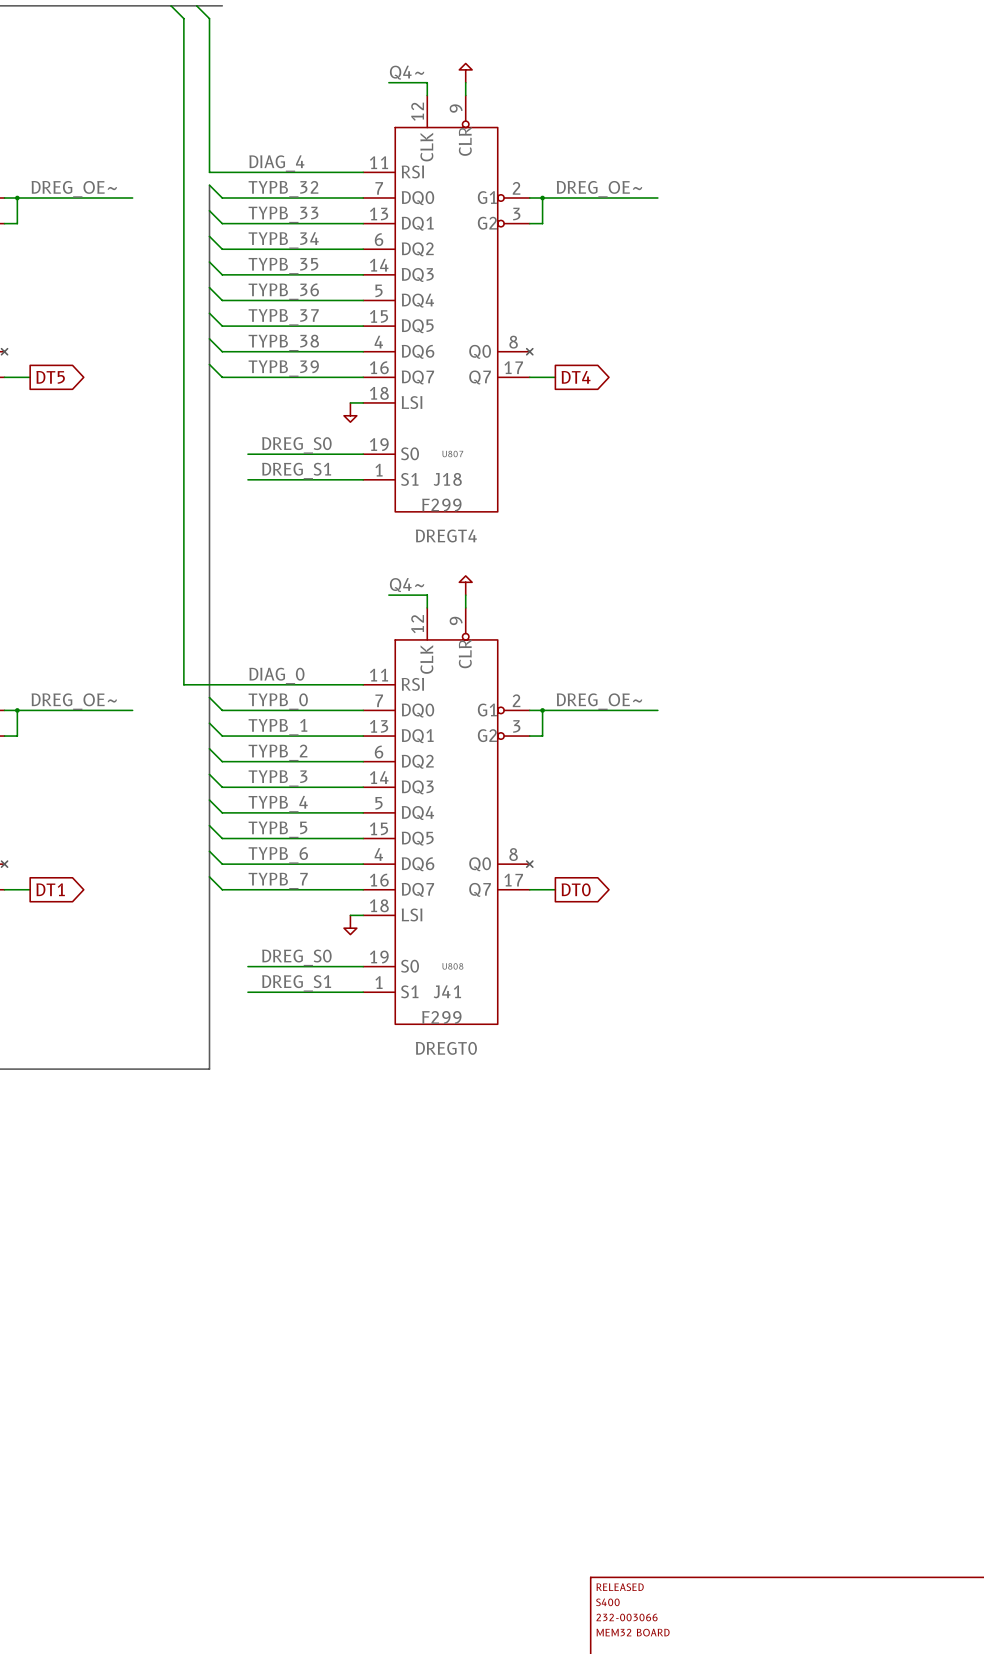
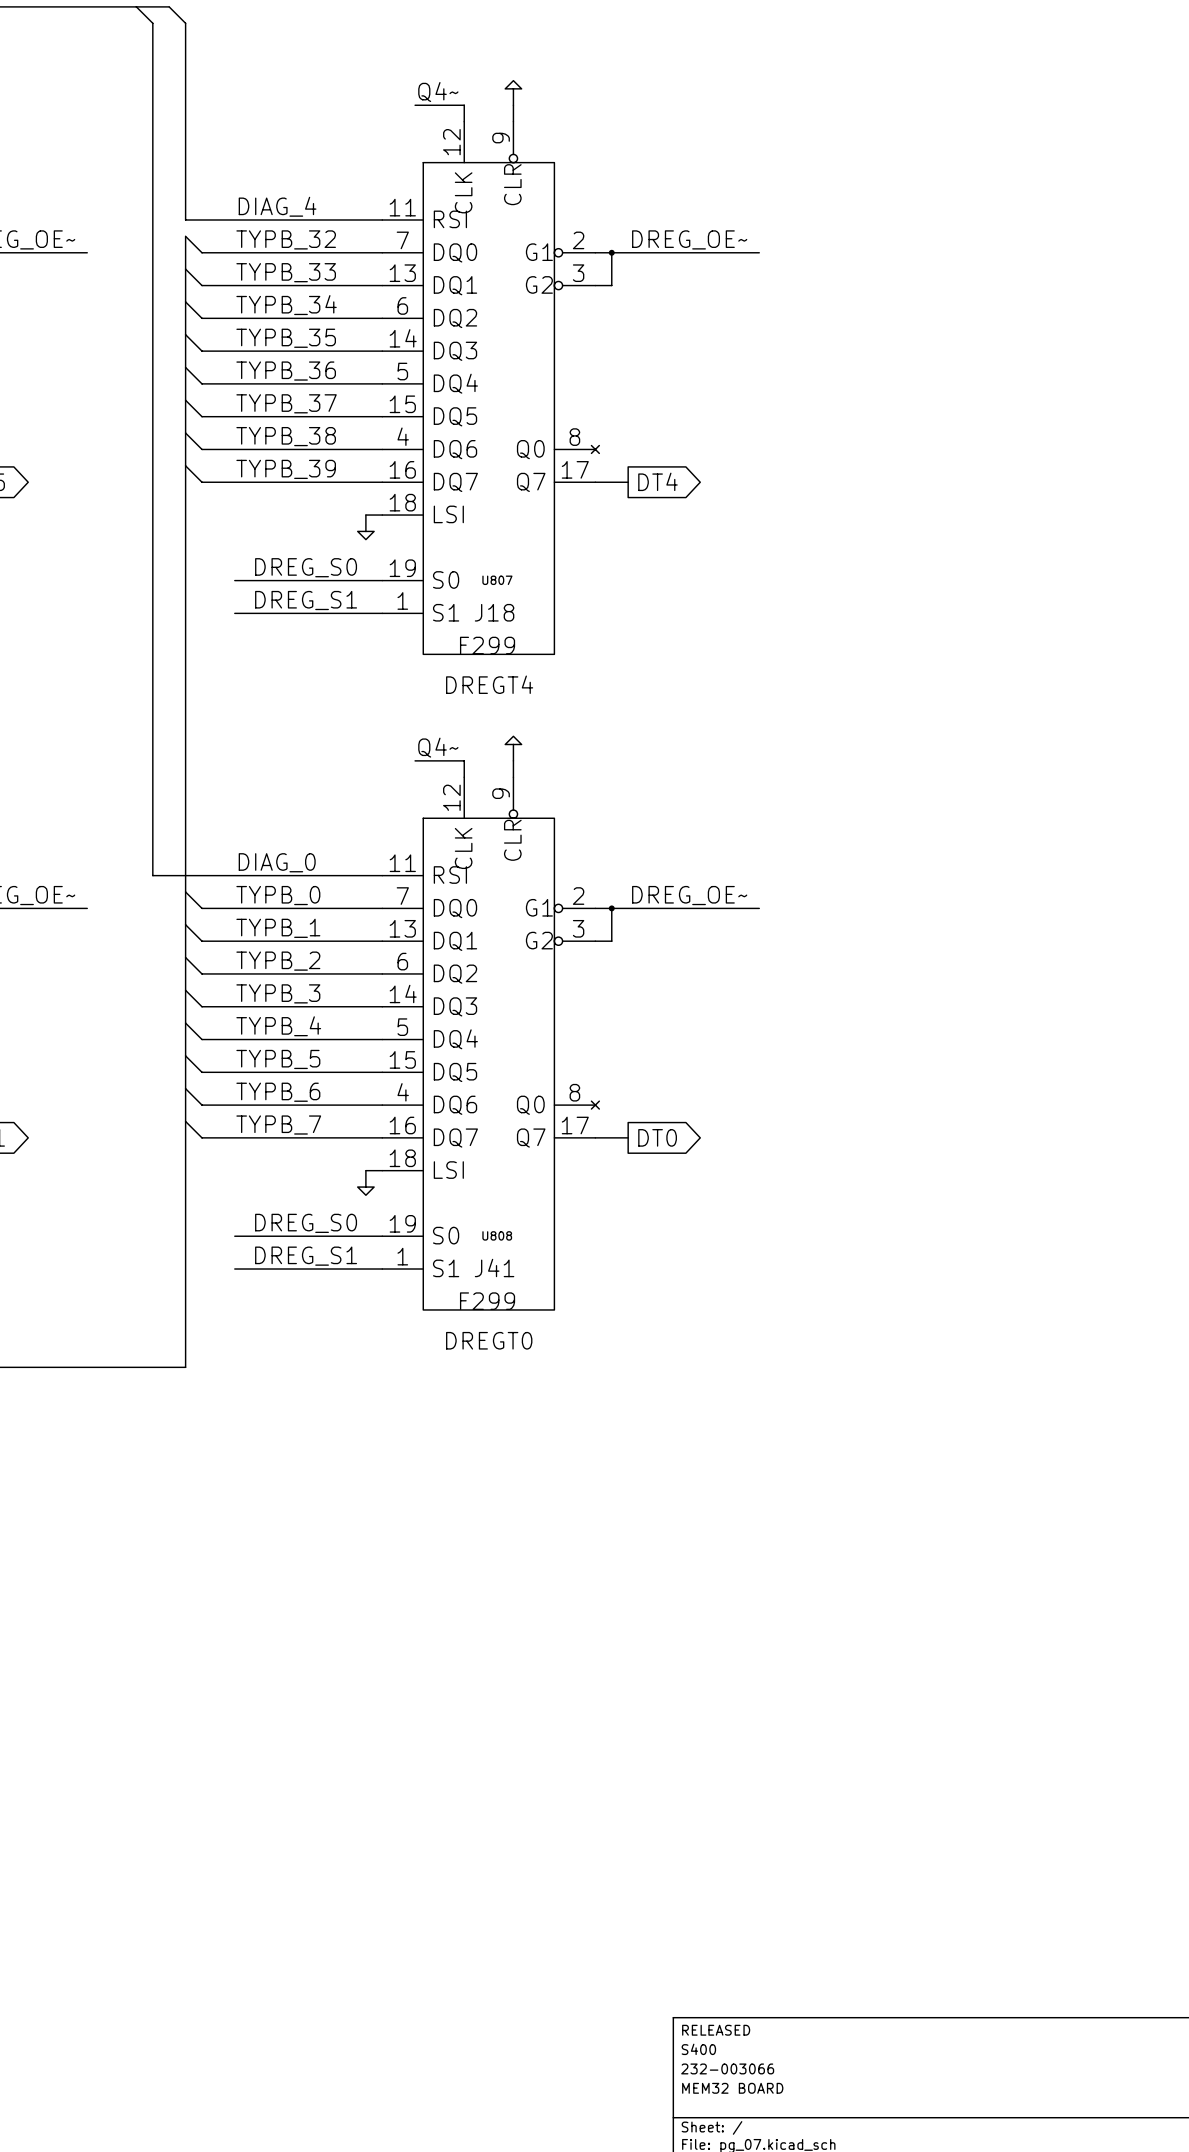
bus: (196, 5) (222, 5) -> none

